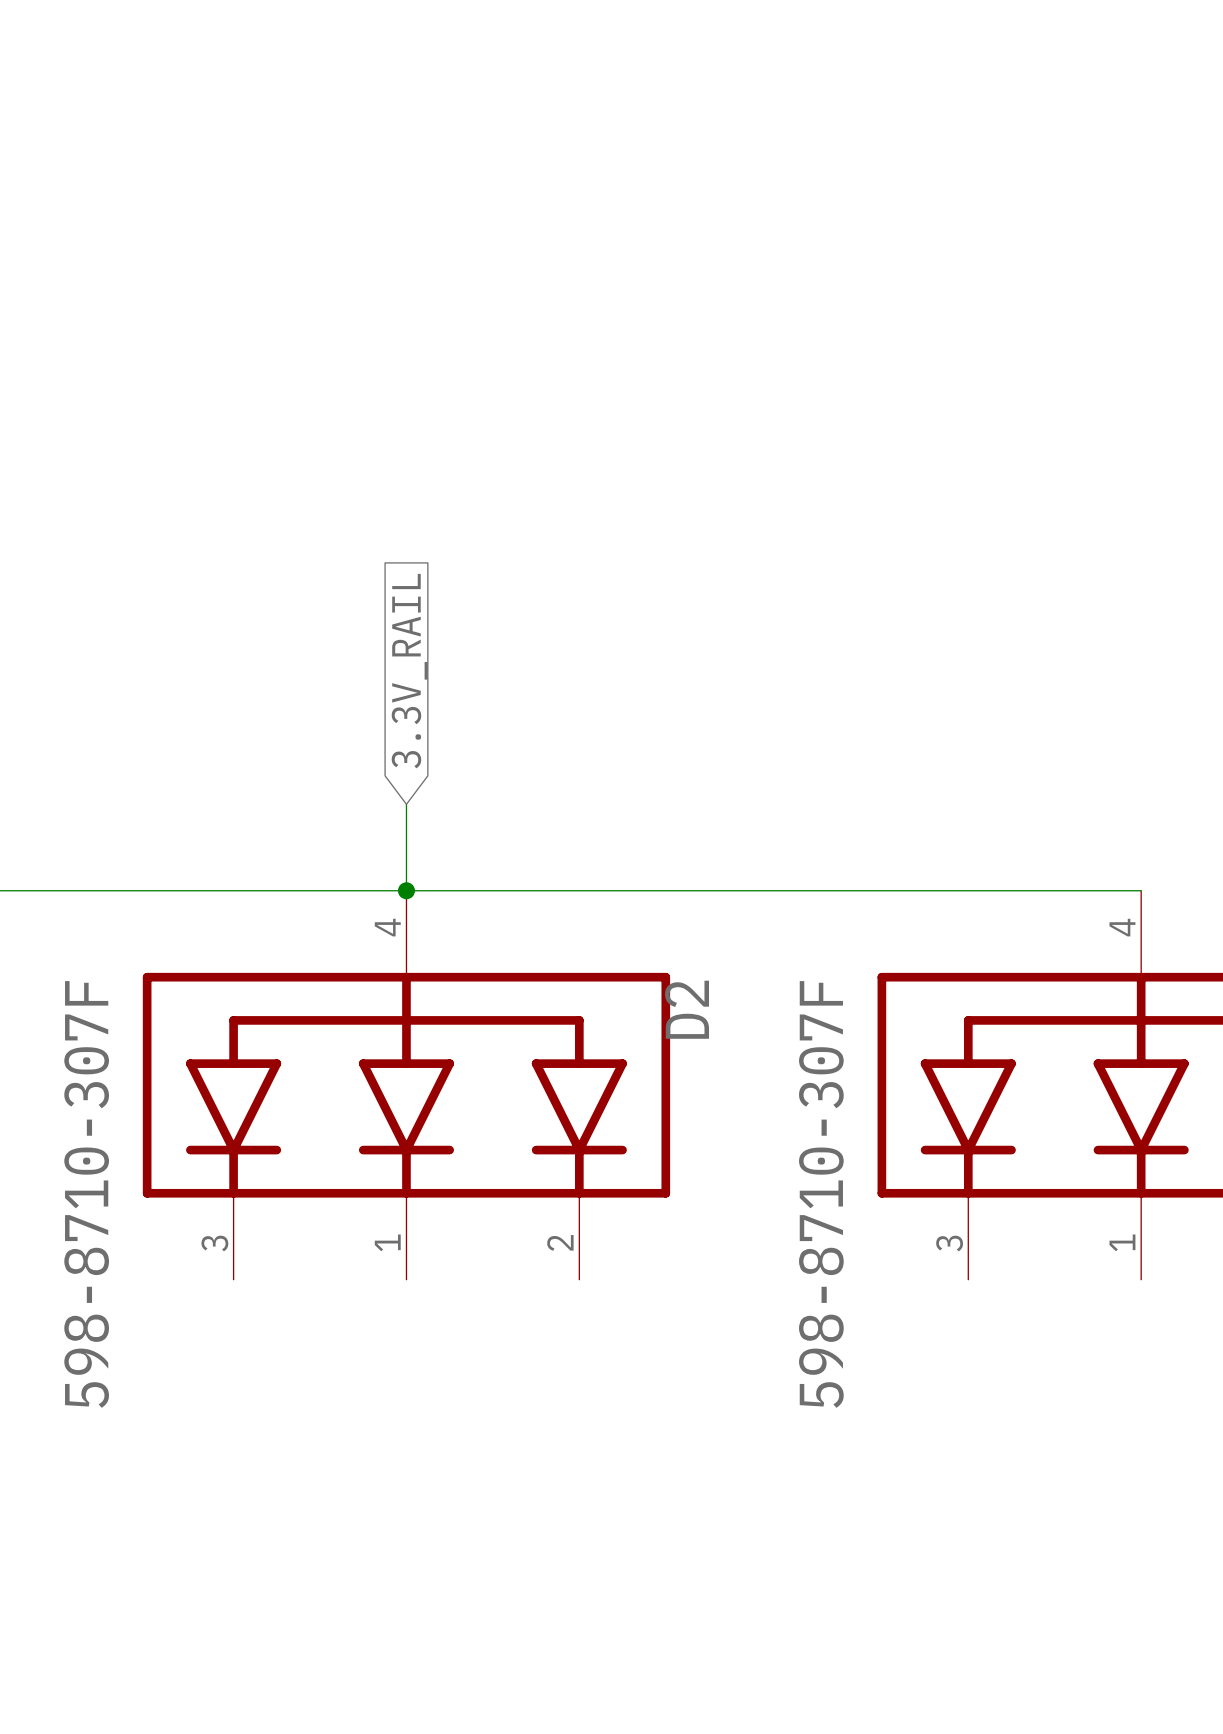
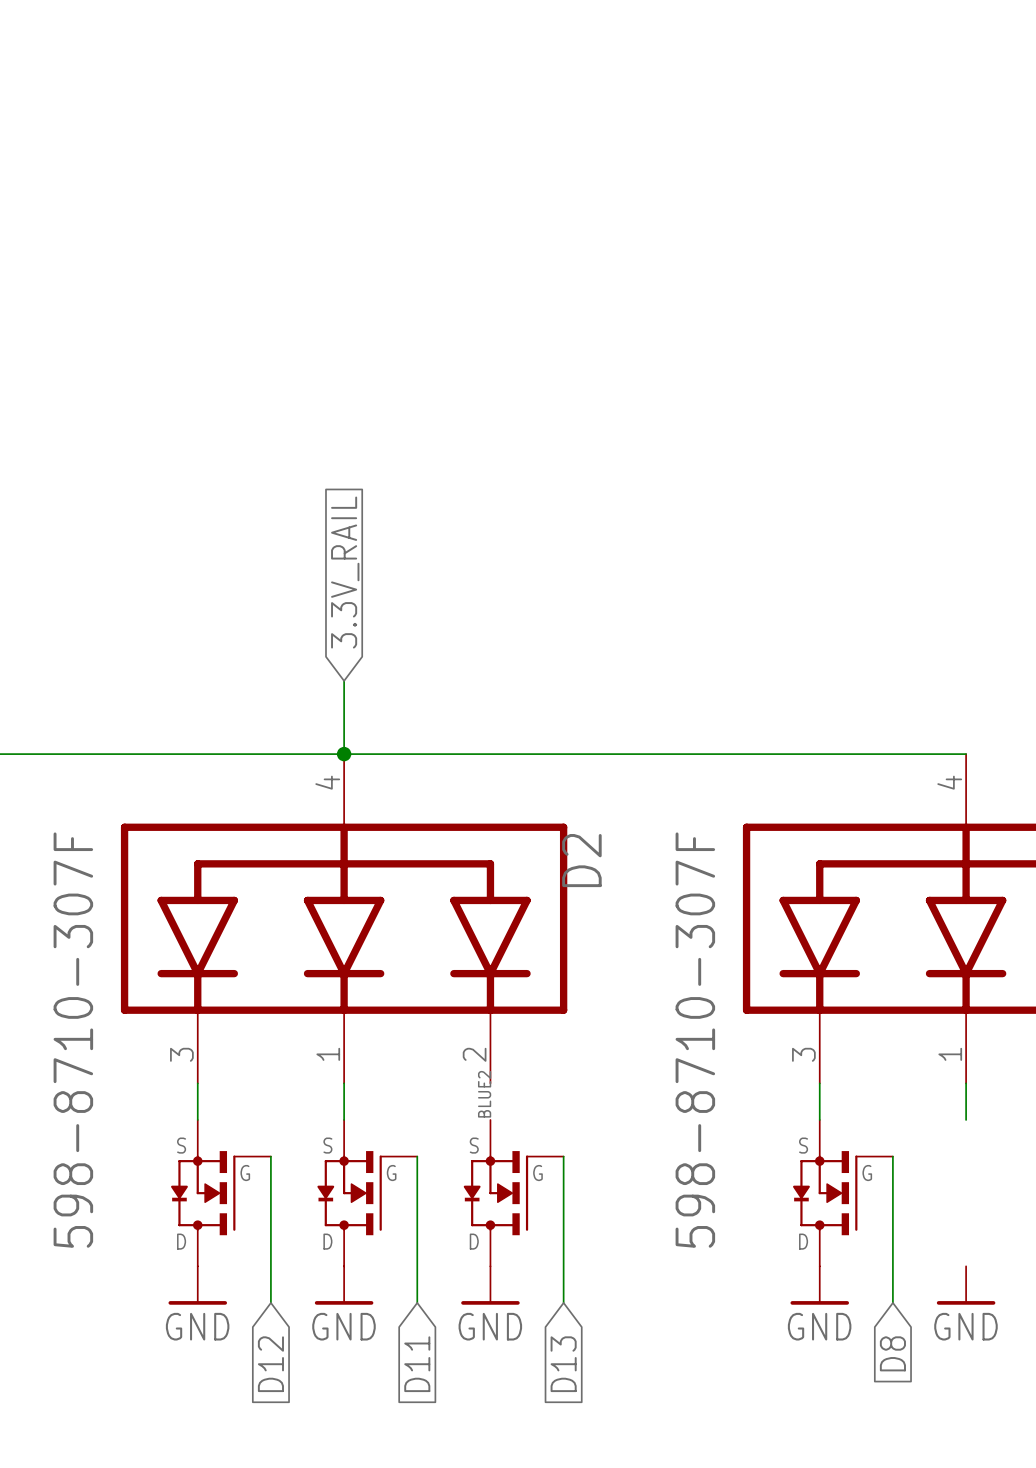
wire: none -> (197, 1083) (197, 1119)
wire: none -> (344, 1083) (344, 1119)
wire: none -> (819, 1083) (819, 1119)
wire: none -> (966, 1083) (966, 1119)
label: none -> BLUE2 (484, 1094)
wire: none -> (270, 1156) (270, 1302)
wire: none -> (417, 1156) (417, 1302)
wire: none -> (563, 1156) (563, 1302)
wire: none -> (892, 1156) (892, 1302)
part: none -> (220, 1193)
part: none -> (367, 1193)
part: none -> (513, 1193)
part: none -> (842, 1193)
power symbol: none -> GND (197, 1285)
power symbol: none -> GND (344, 1285)
power symbol: none -> GND (490, 1285)
power symbol: none -> GND (819, 1285)
power symbol: none -> GND (966, 1285)
global label: none -> D8 (892, 1353)
global label: none -> D12 (270, 1364)
global label: none -> D11 (417, 1364)
global label: none -> D13 (563, 1364)

